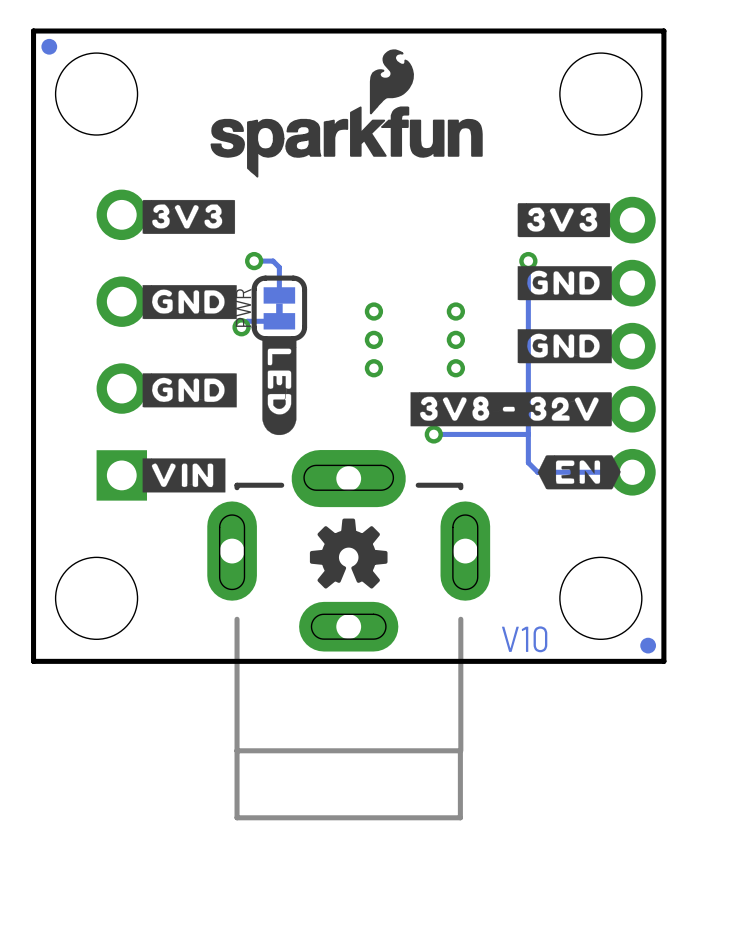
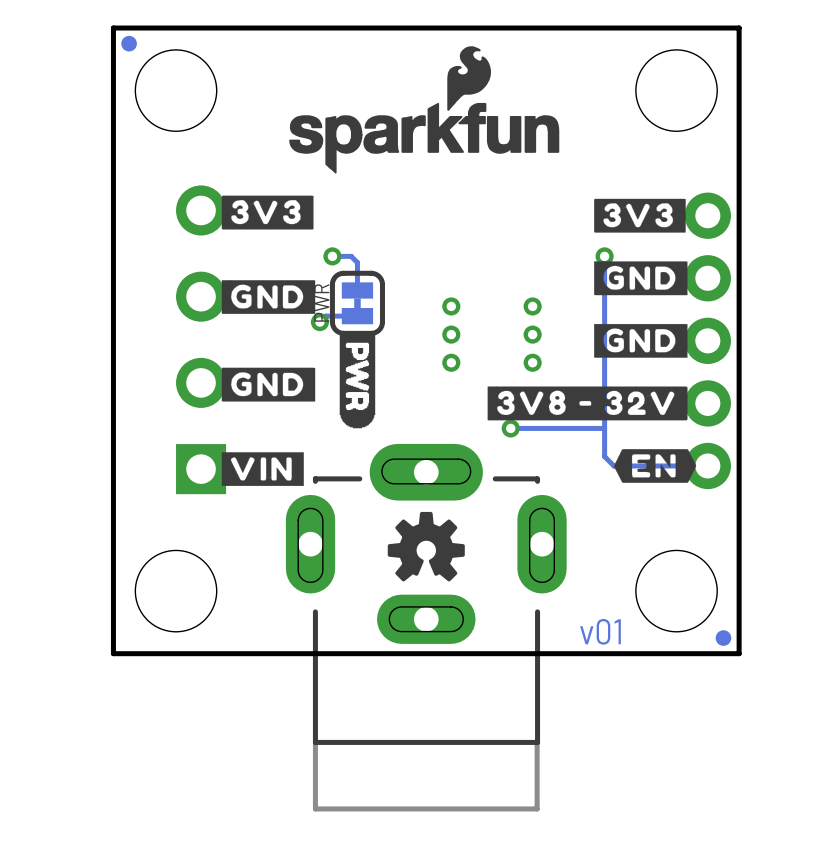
drawing shape: [262, 338, 297, 436] -> [339, 332, 376, 429]
part footprint: [207, 450, 491, 821] -> [285, 443, 567, 812]
text: V10 (524, 639) -> v01 (600, 631)

